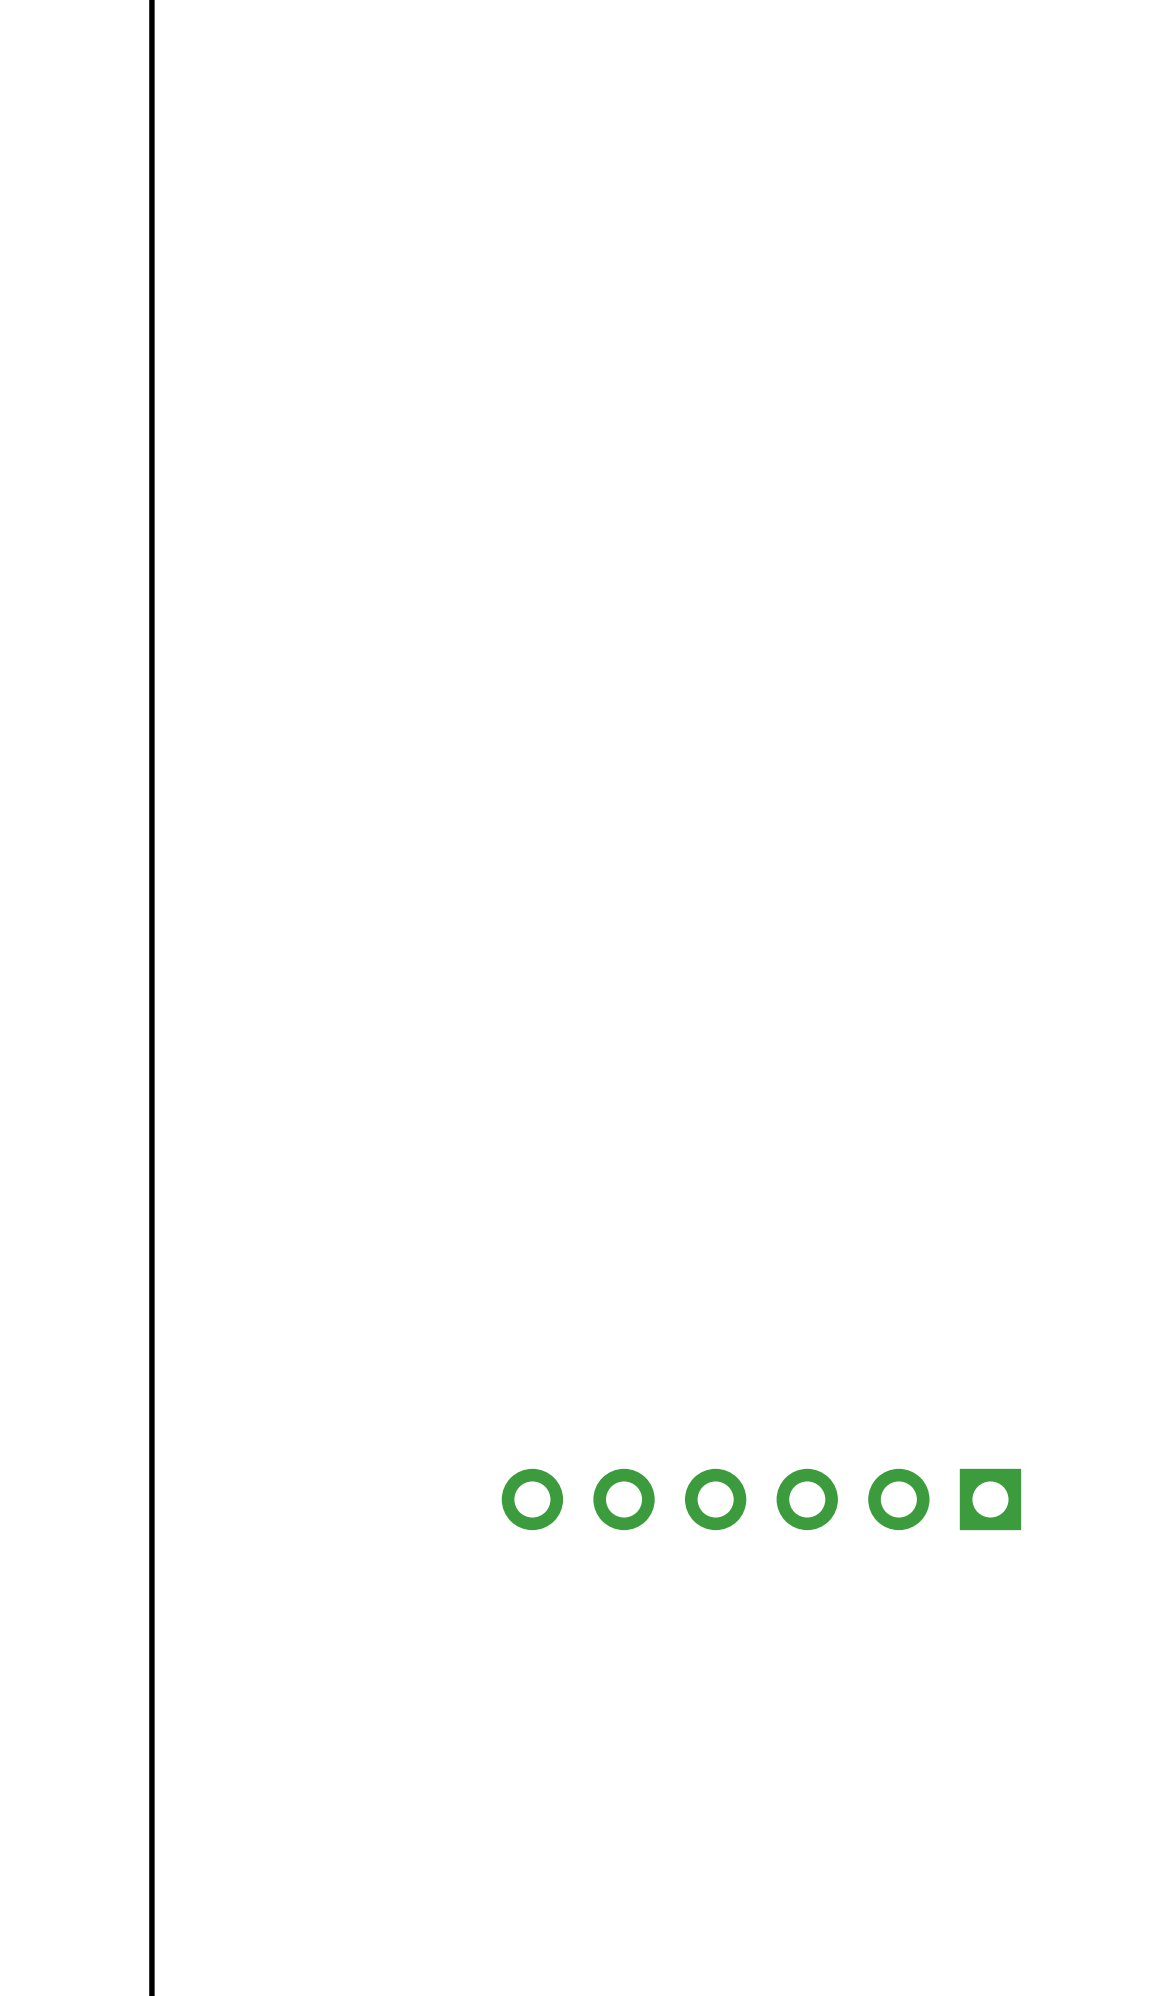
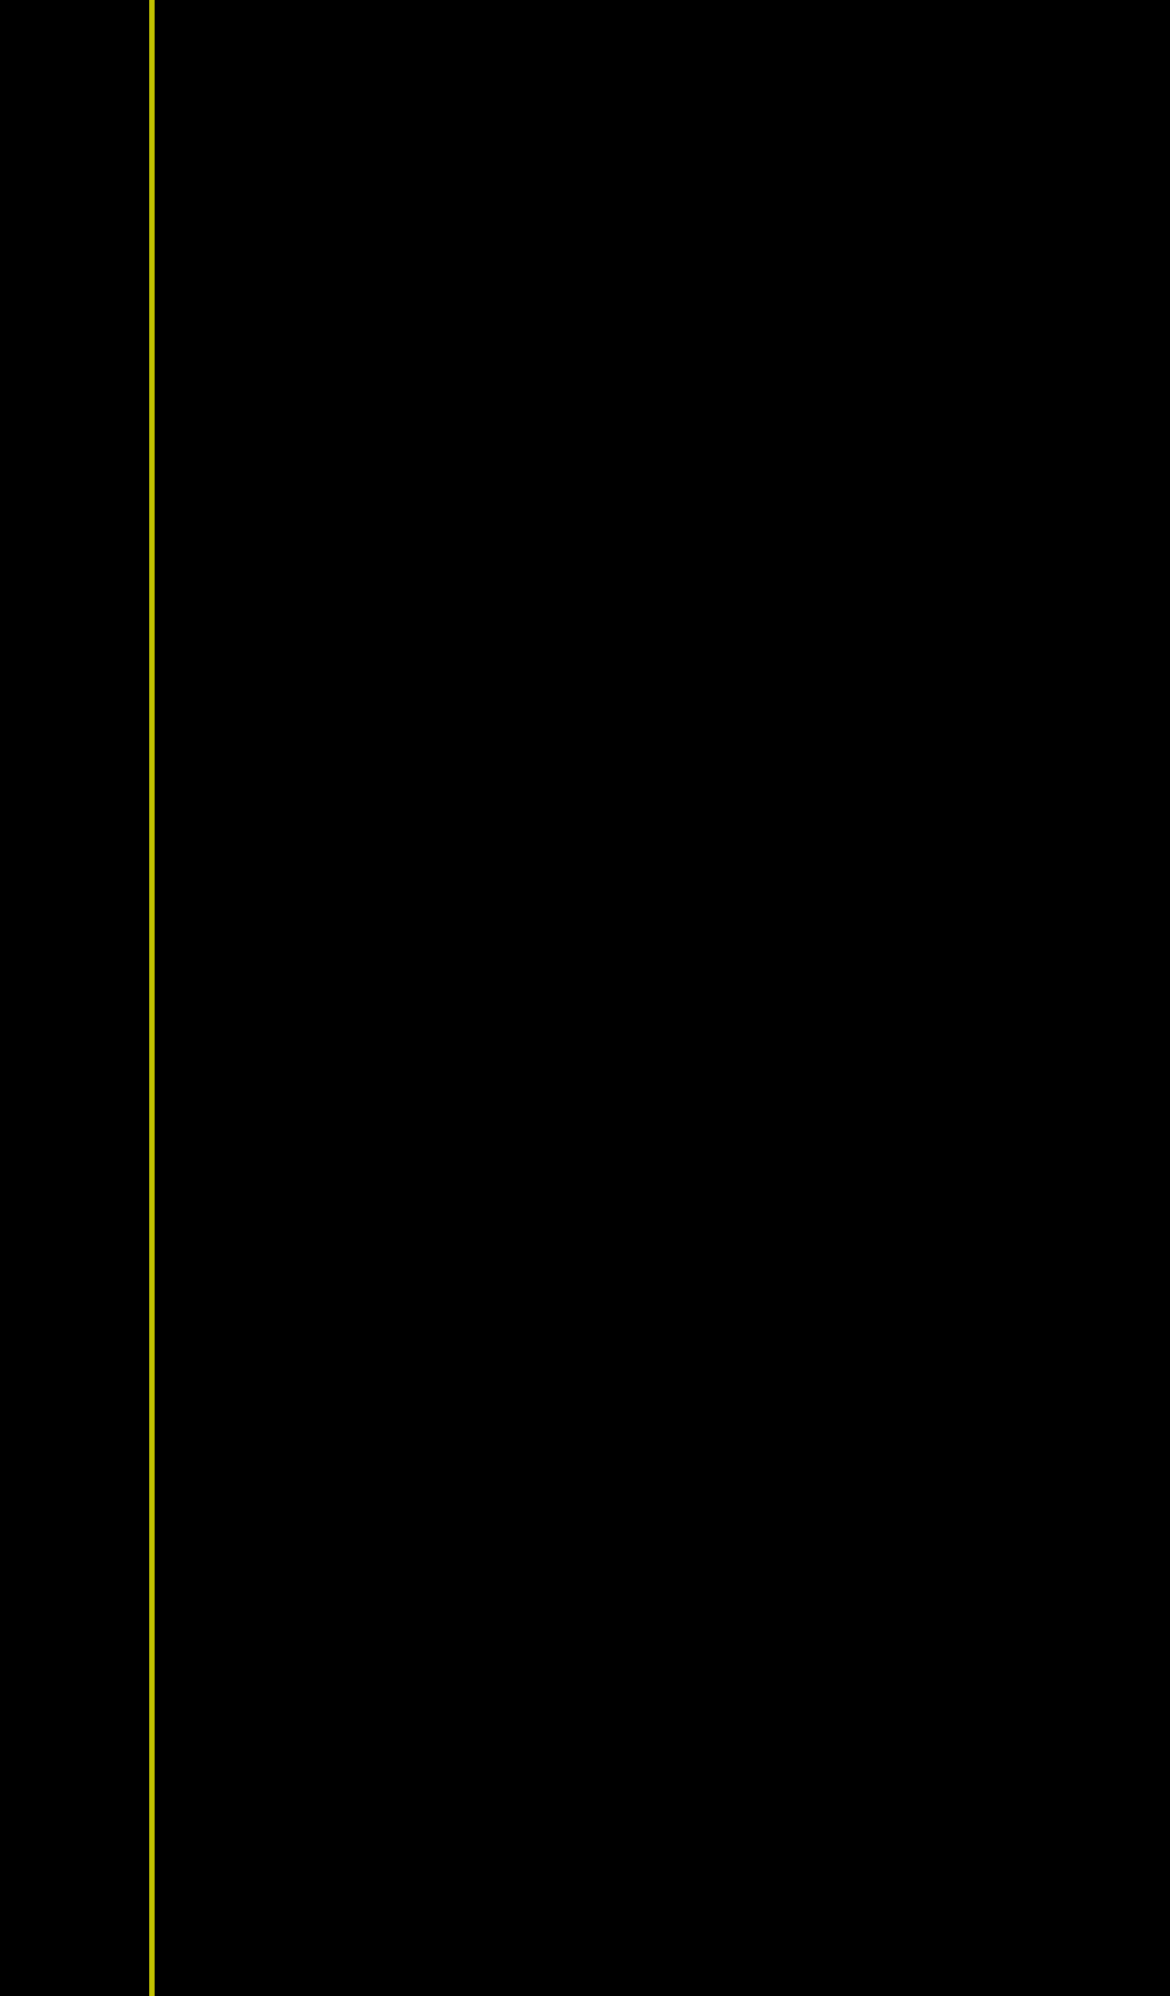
part: (761, 1499) -> none

